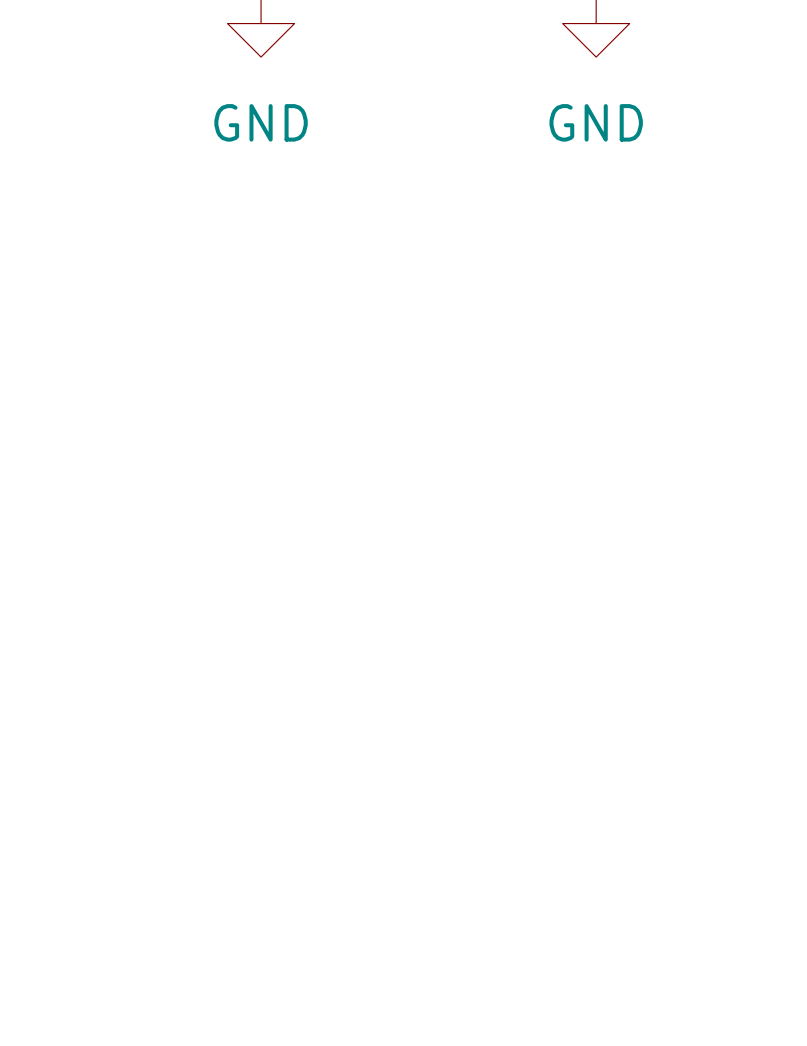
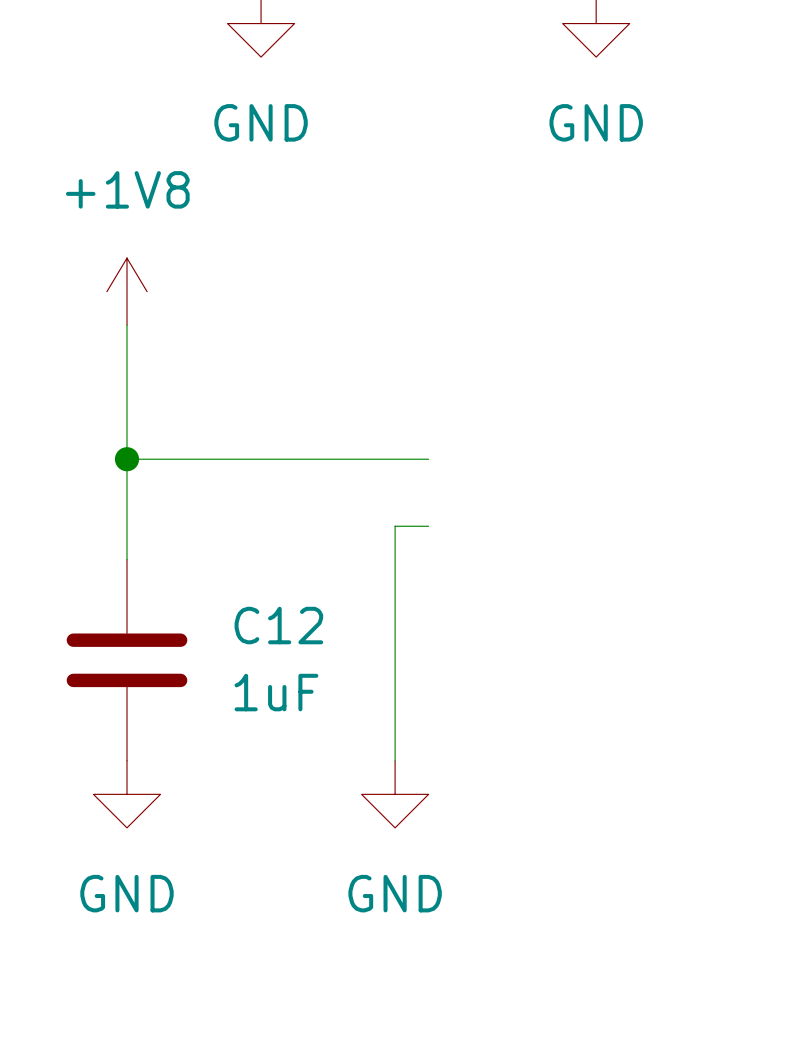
power symbol: none -> +1V8 (127, 291)
wire: none -> (127, 325) (127, 559)
wire: none -> (127, 459) (428, 459)
junction: none -> (127, 459)
wire: none -> (428, 526) (395, 526) (395, 760)
C12: none -> 1uF (127, 660)
power symbol: none -> GND (127, 794)
power symbol: none -> GND (395, 794)

